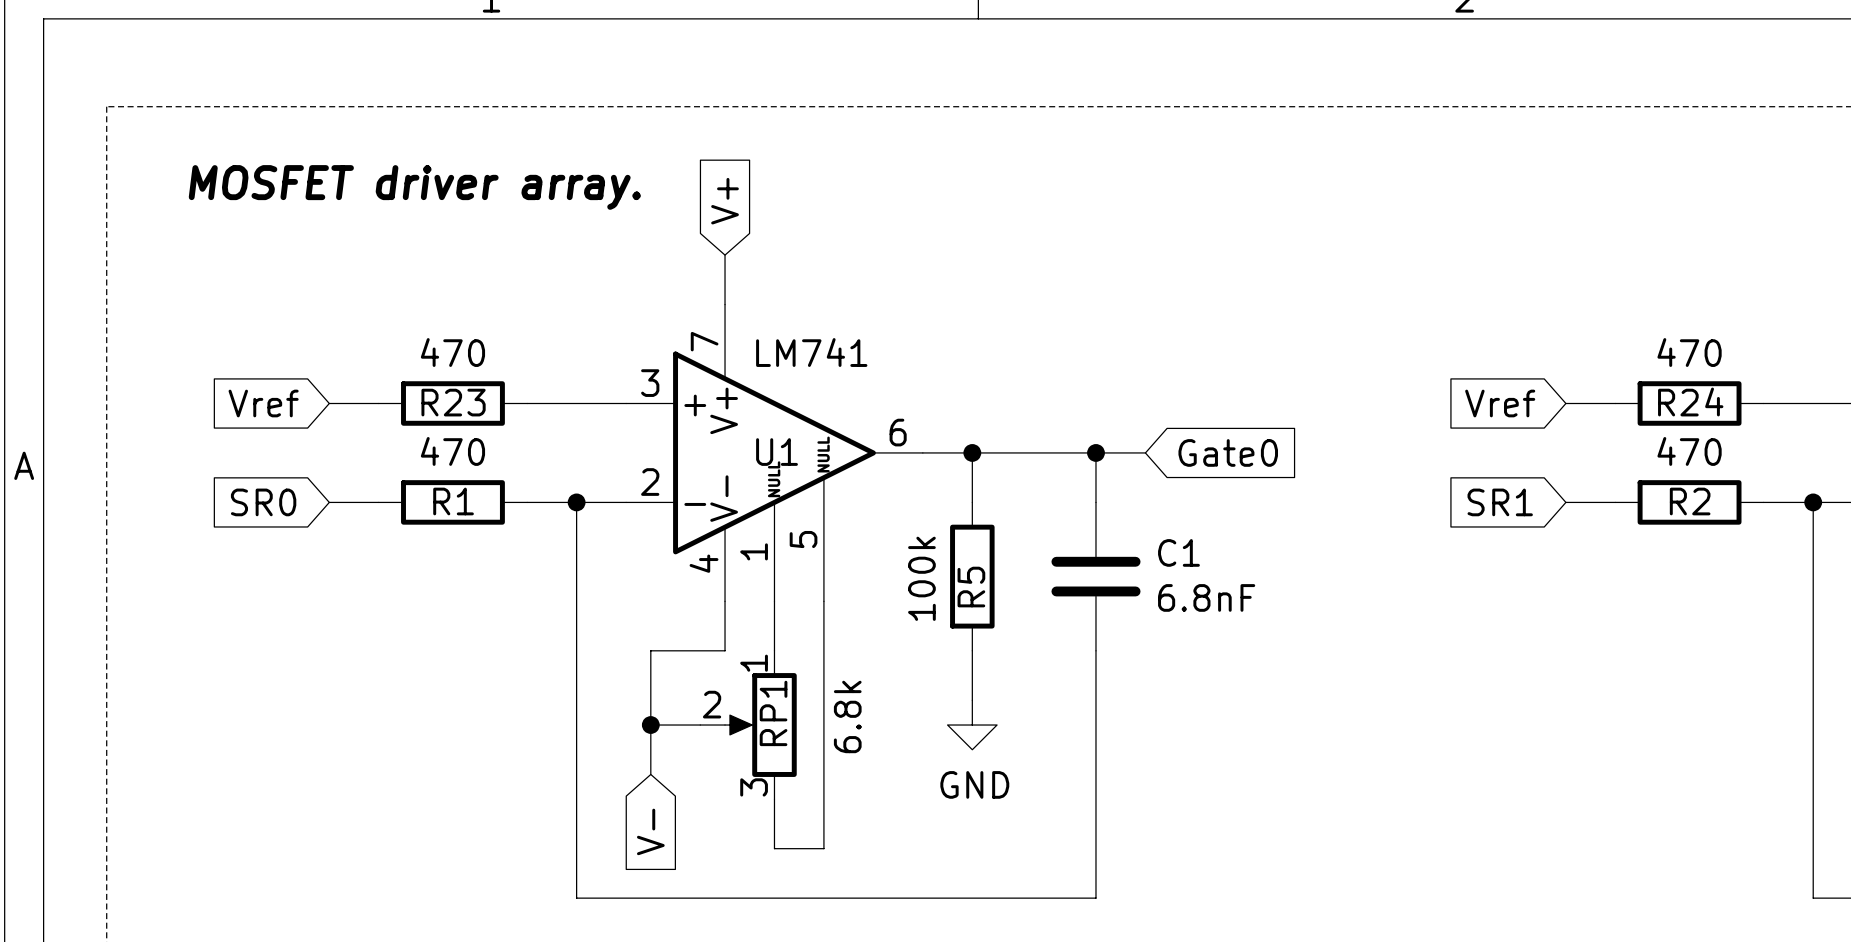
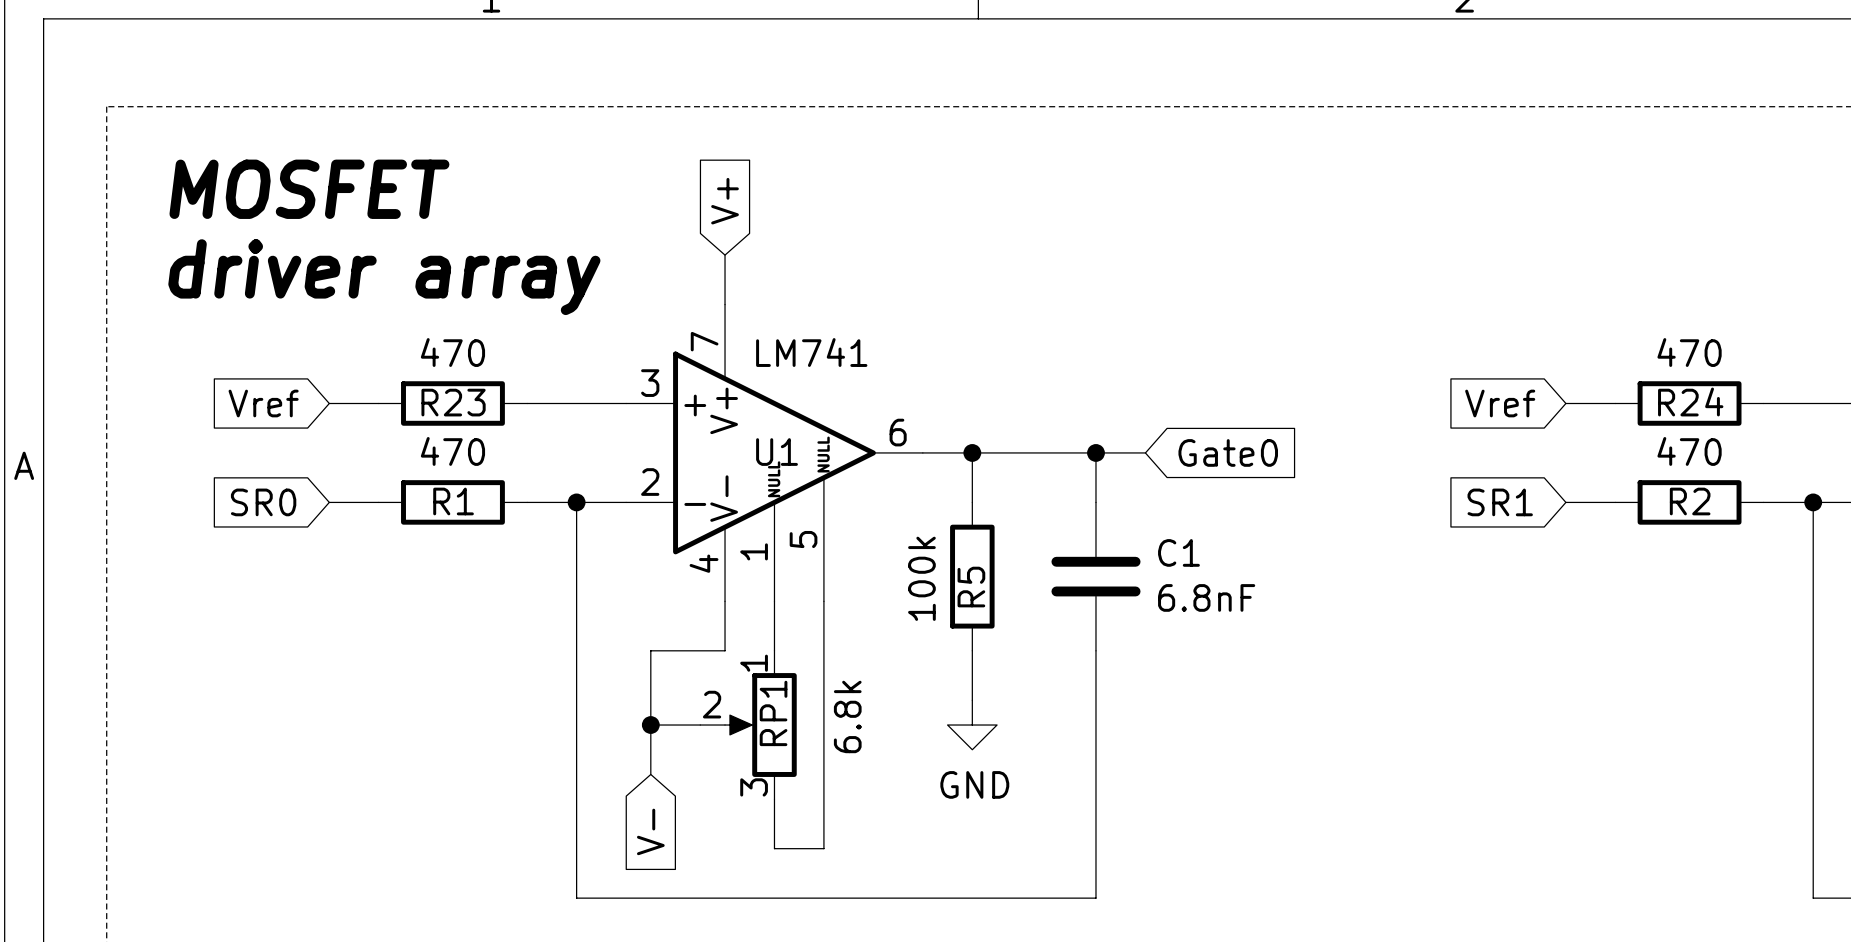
text: MOSFET driver array. (414, 187) -> none
text: none -> MOSFET (309, 189)
text: none -> driver array (384, 277)

